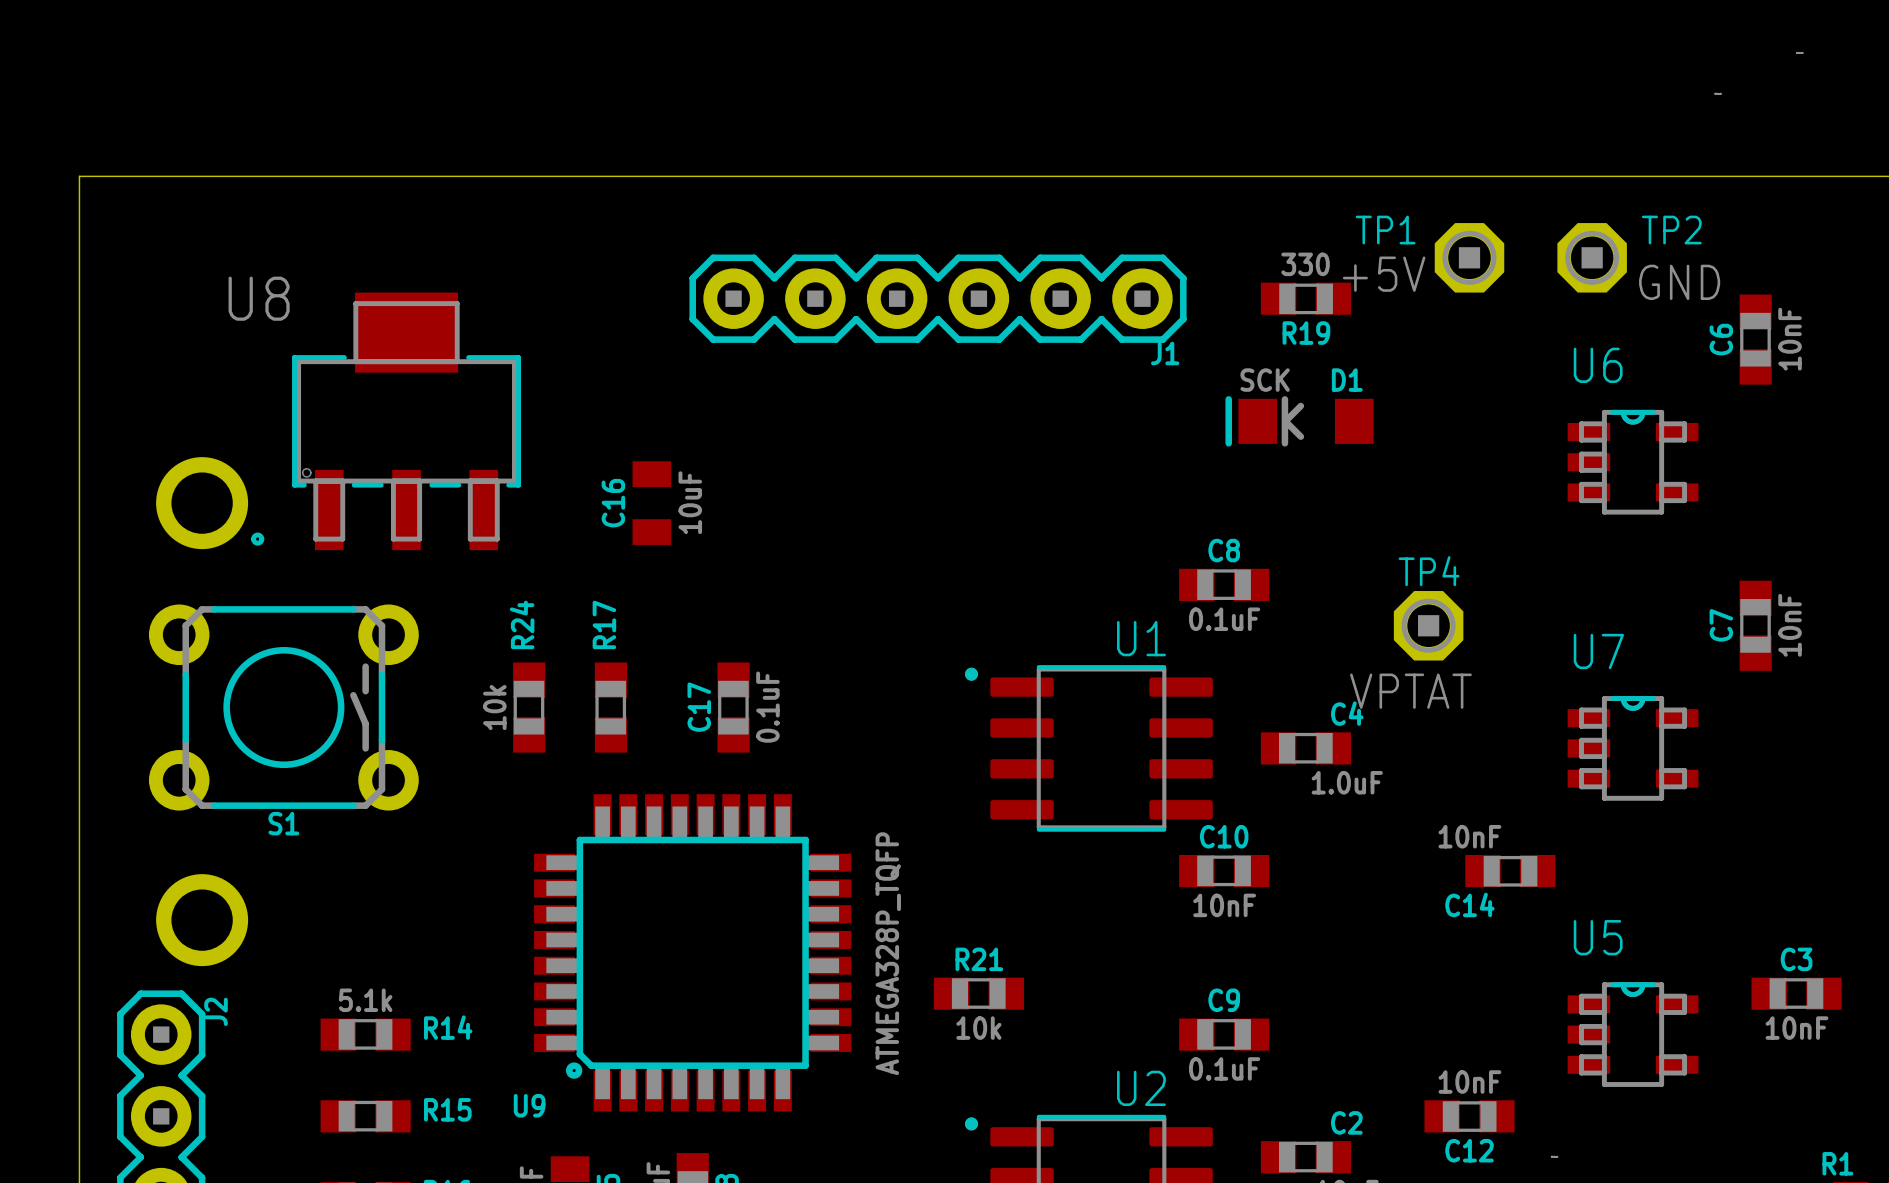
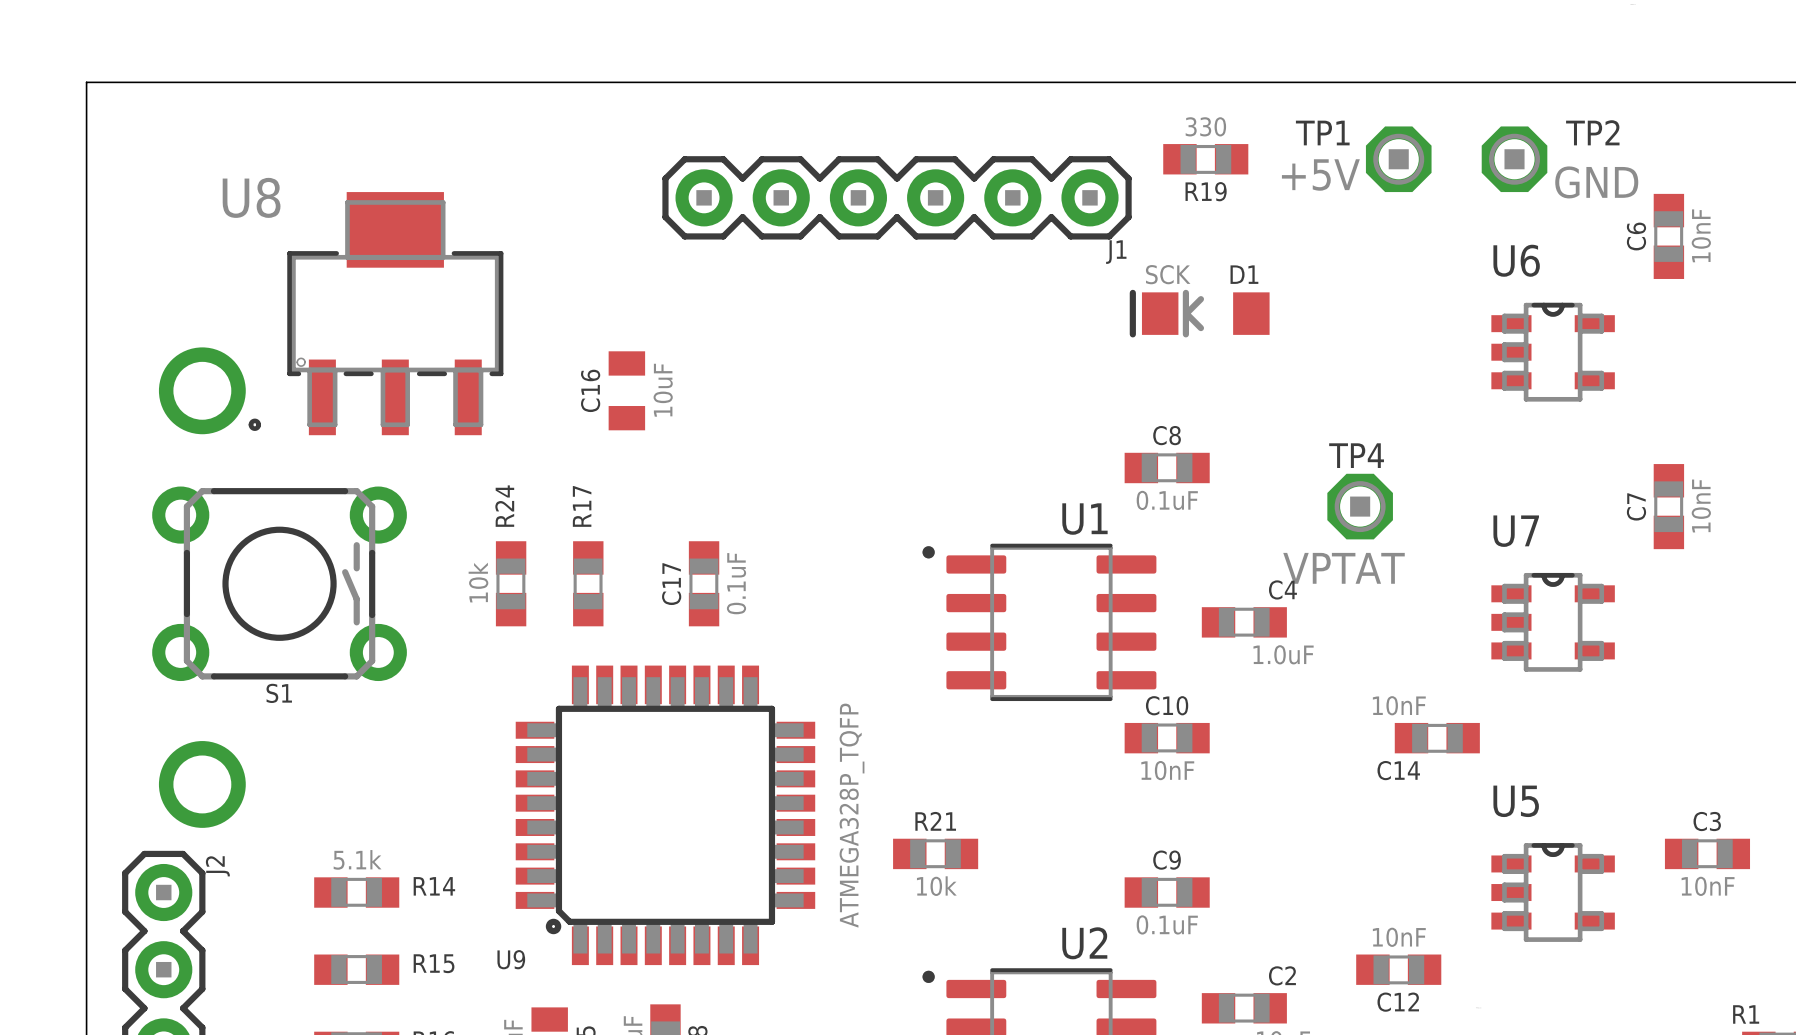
R19 position: (1305, 298) -> (1205, 159)
D1 position: (1299, 421) -> (1199, 313)

